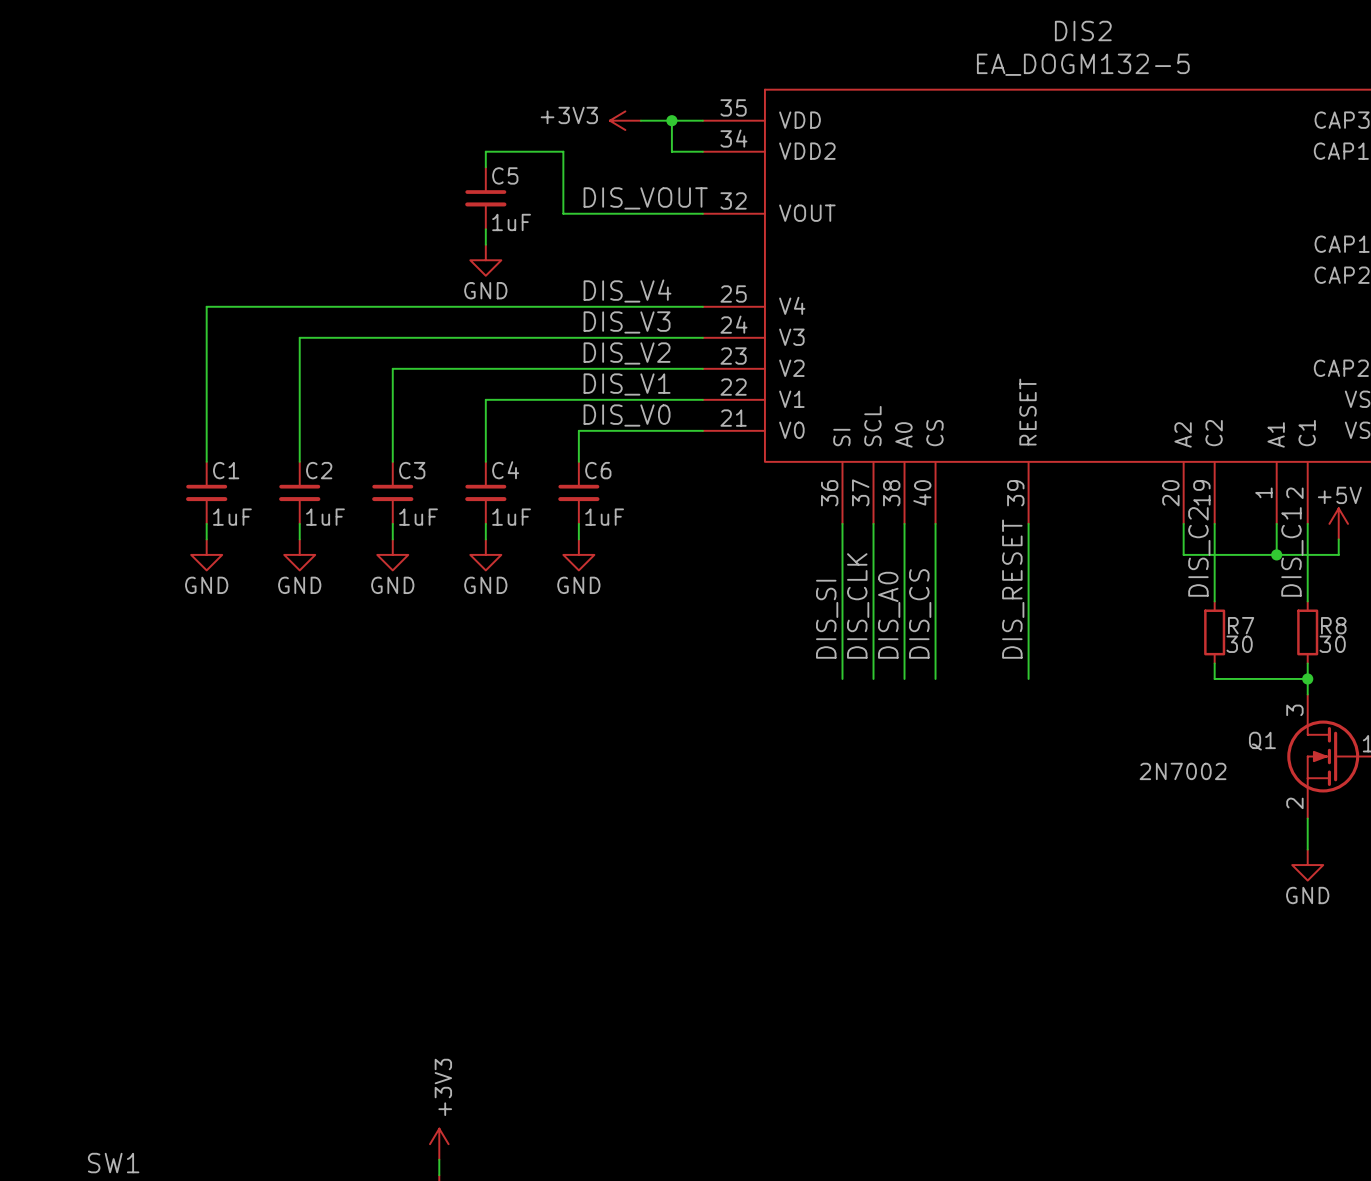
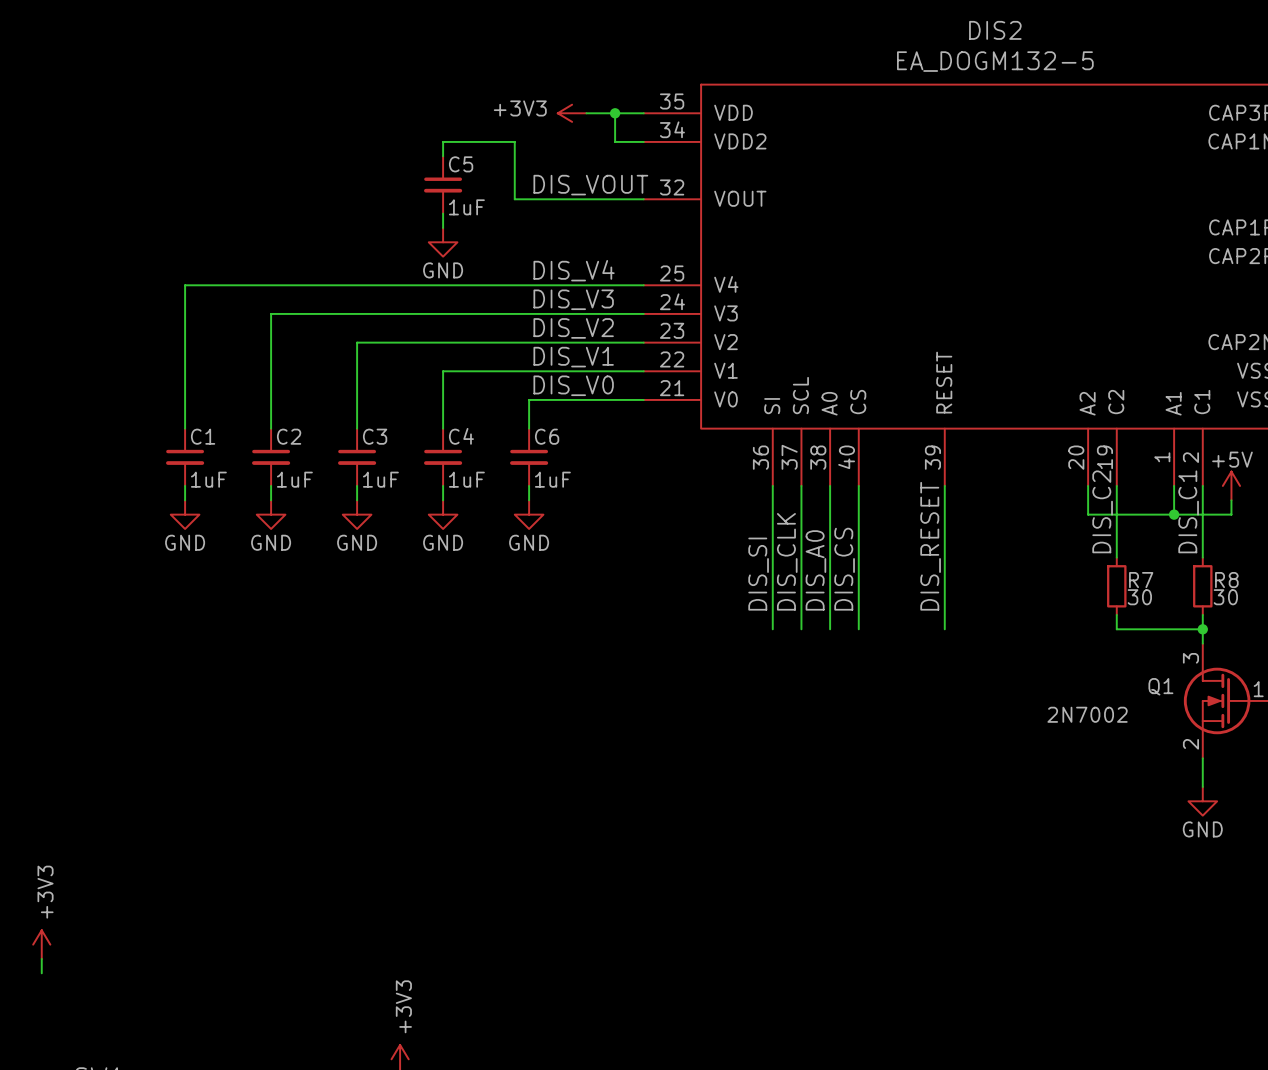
power symbol: none -> +3V3 (41, 944)
wire: none -> (41, 958) (41, 973)

